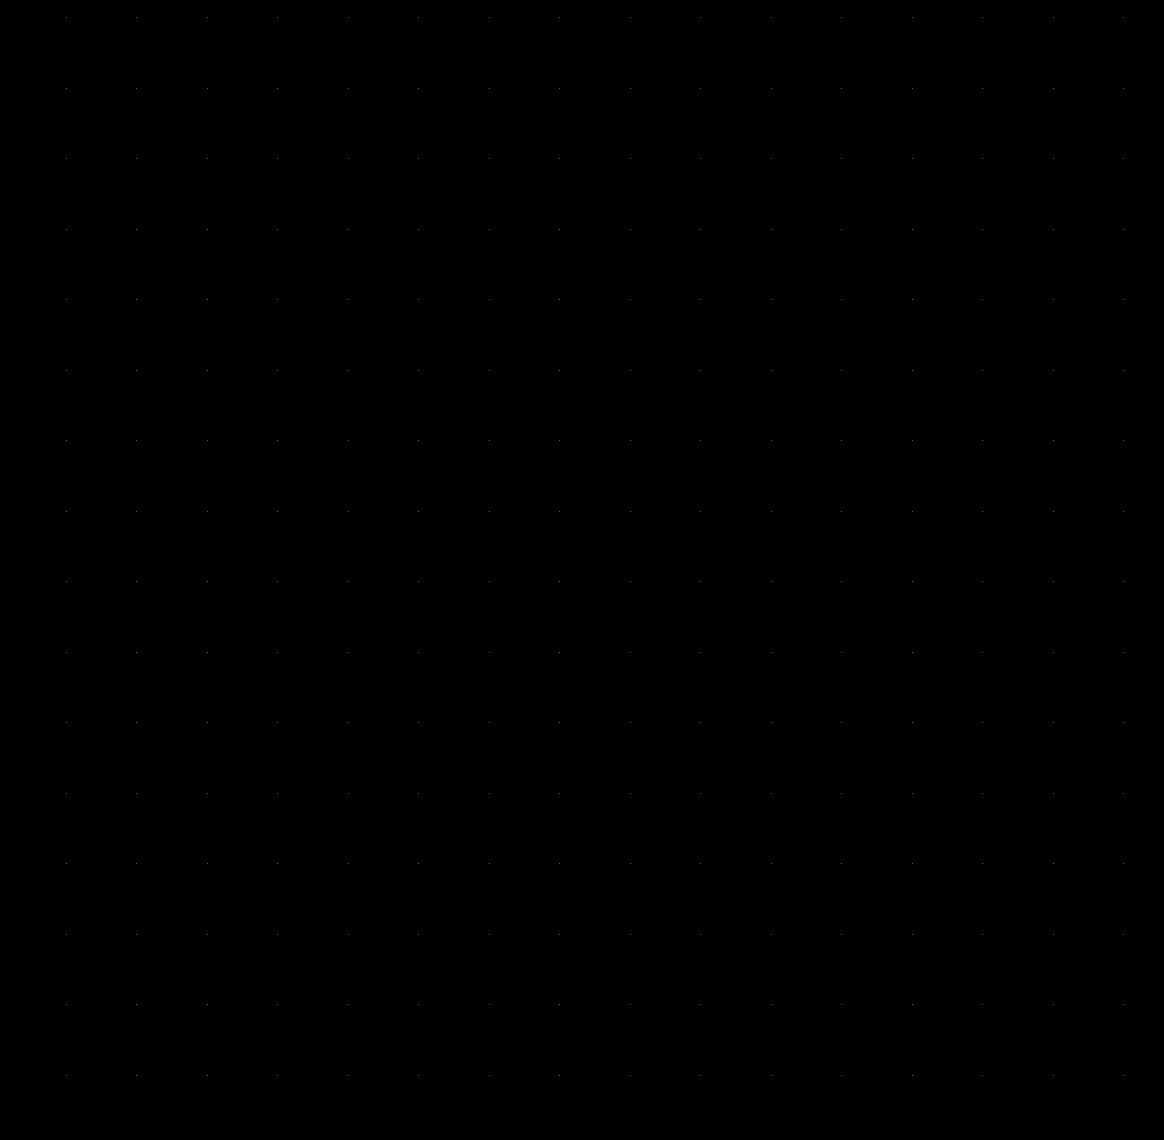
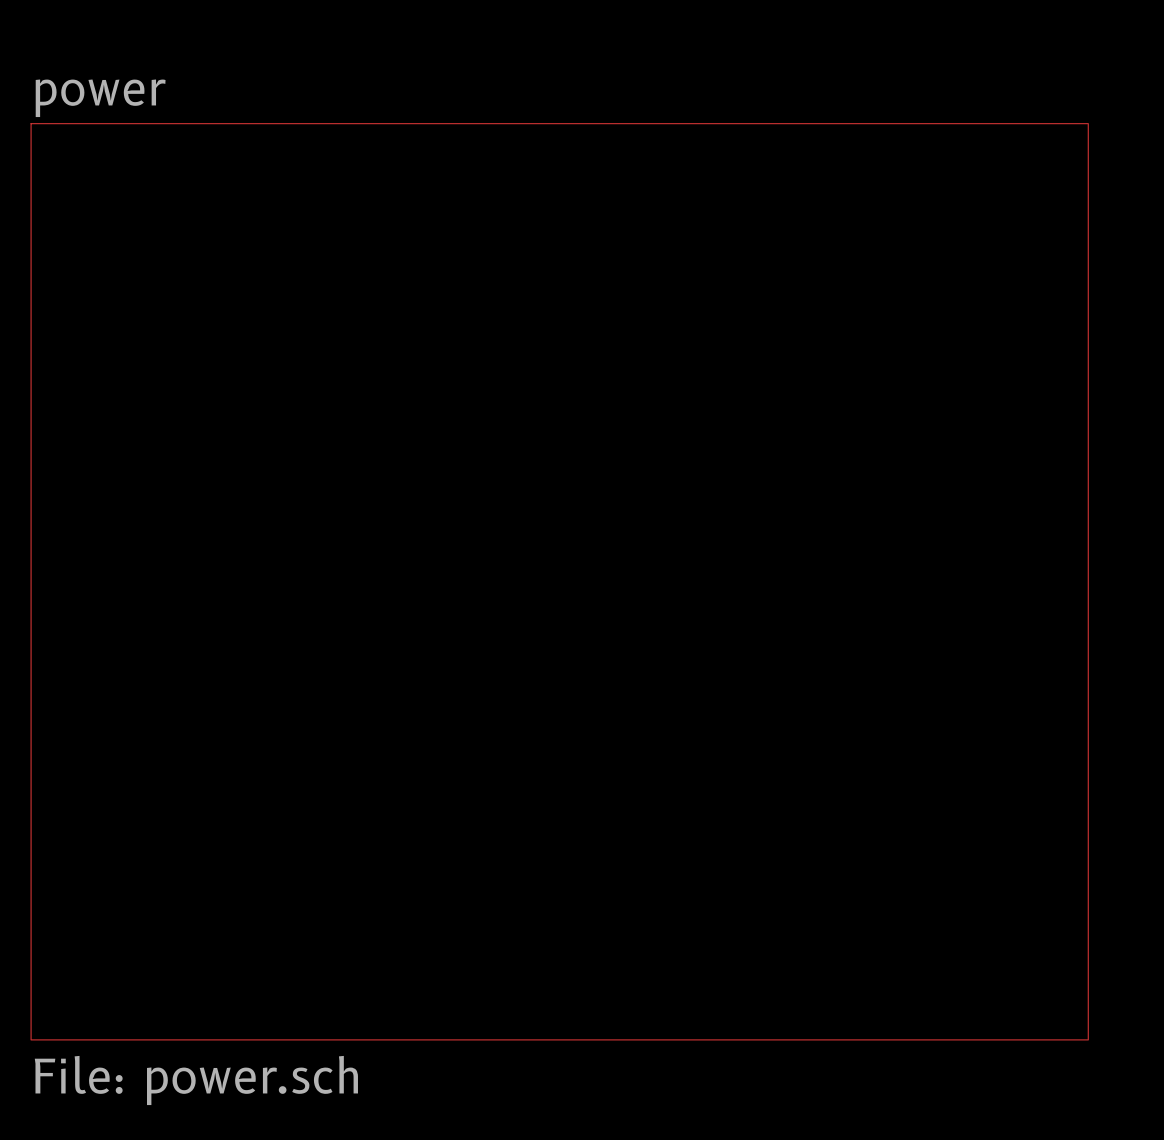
sheet power: none -> File: power.sch (559, 581)

